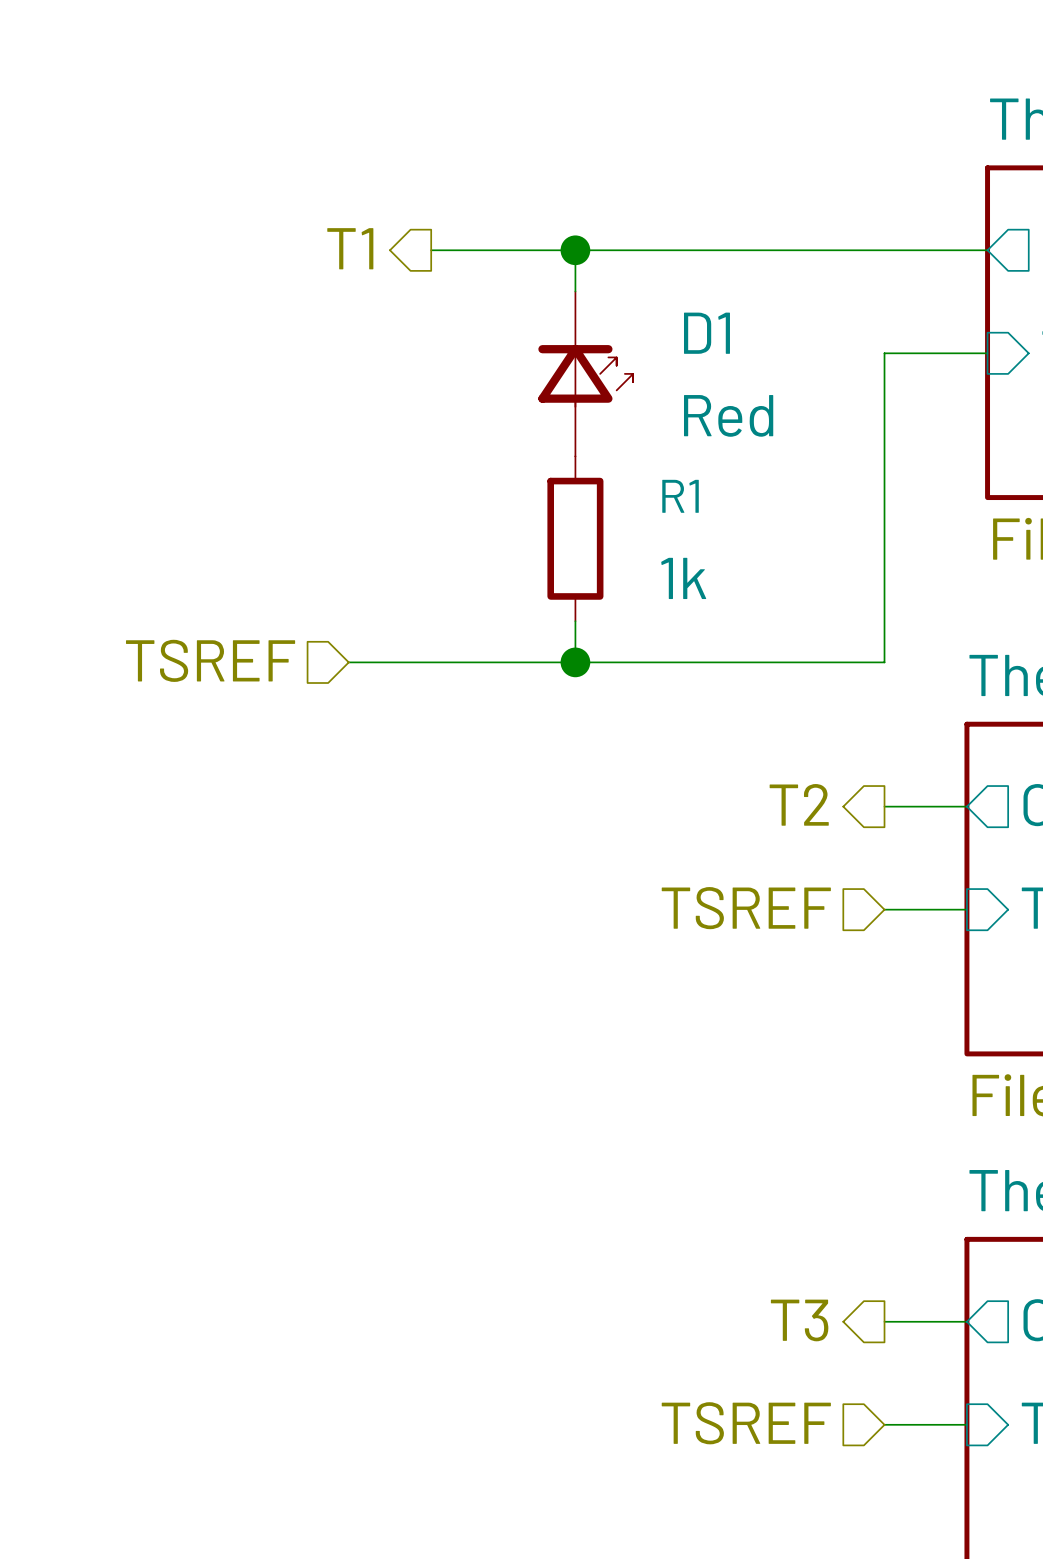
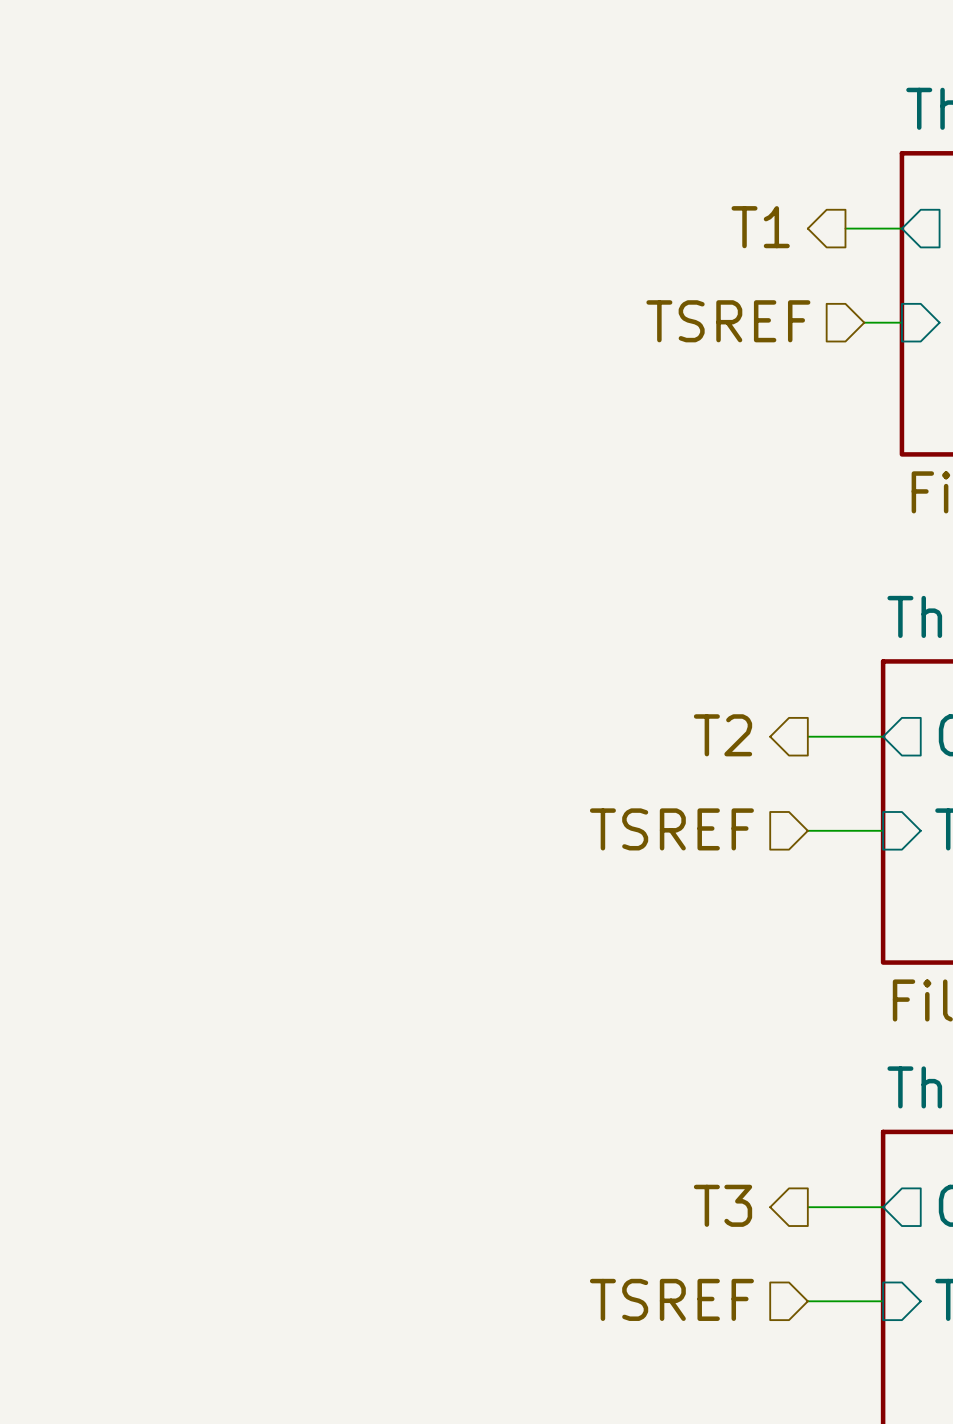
hierarchical label position: T1 (350, 248) -> T1 (760, 227)
wire: (431, 250) (925, 250) -> none
wire: (575, 250) (575, 291) -> none
junction: (575, 250) -> none
wire: (946, 353) (884, 353) (884, 662) (348, 662) -> none
D1: Red (585, 373) -> none
R1: 1k (575, 538) -> none
wire: (575, 621) (575, 662) -> none
hierarchical label position: TSREF (210, 660) -> TSREF (728, 321)
junction: (575, 662) -> none

